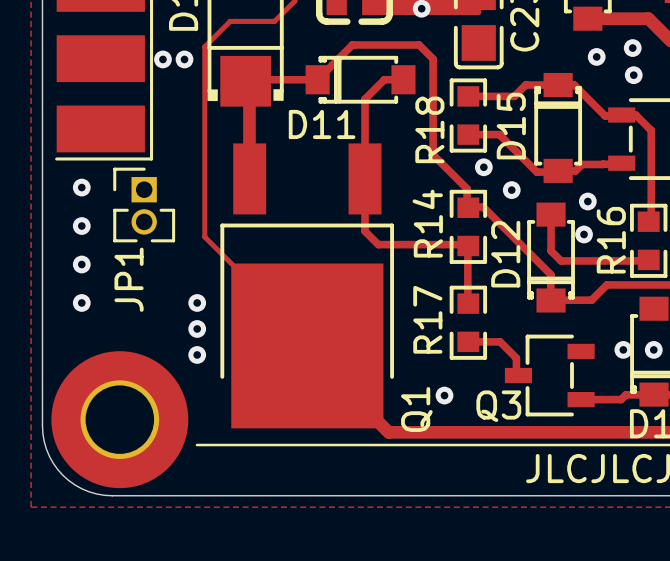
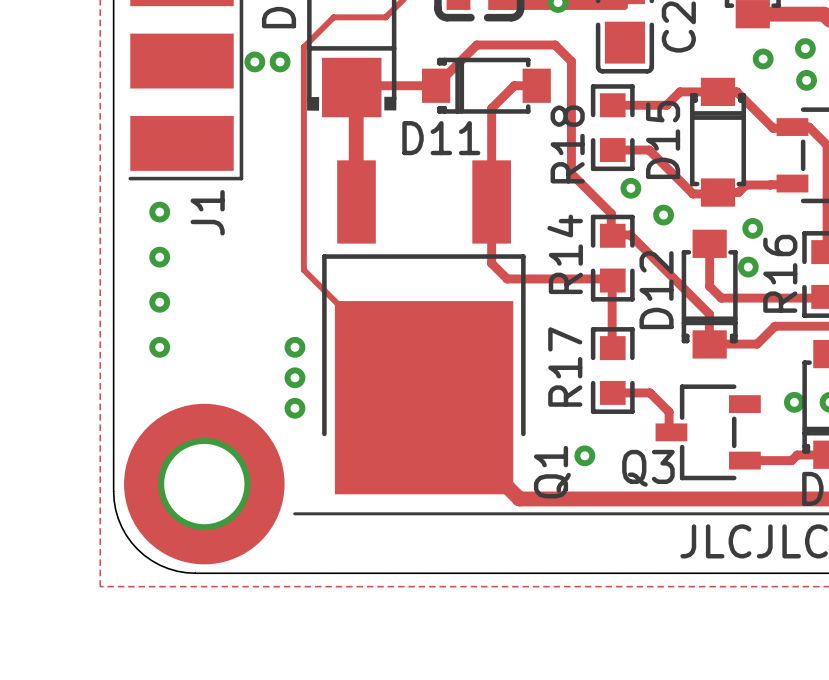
J1 name: none -> J1 (207, 212)
JP1: (144, 204) -> none

